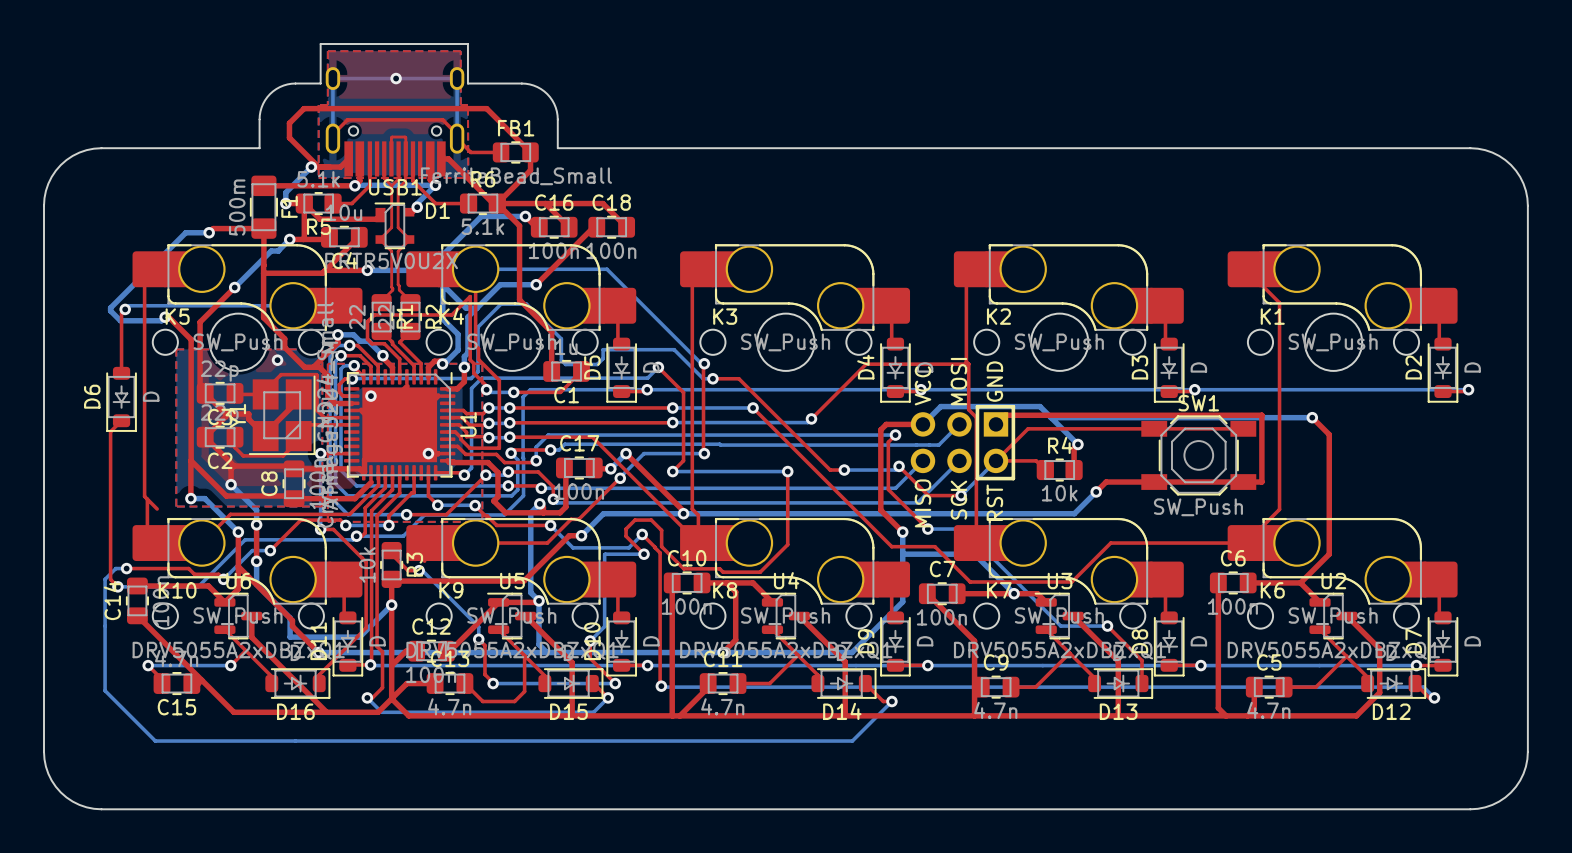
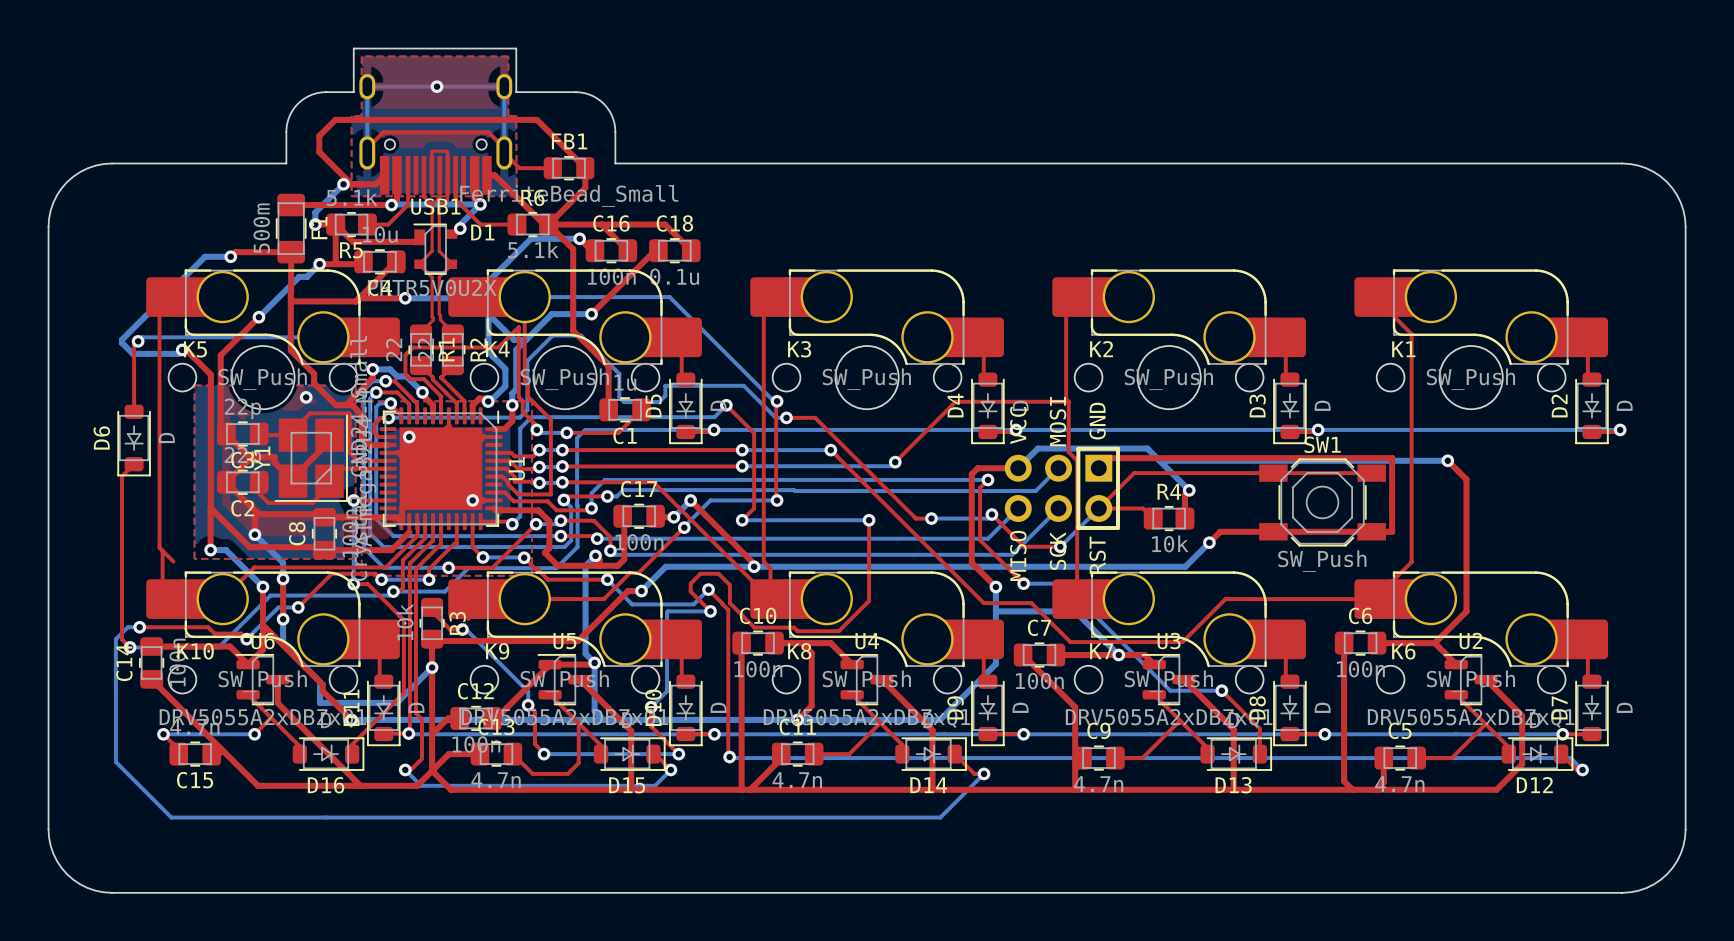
C18 value: 100n (611, 250) -> 0.1u (674, 276)

